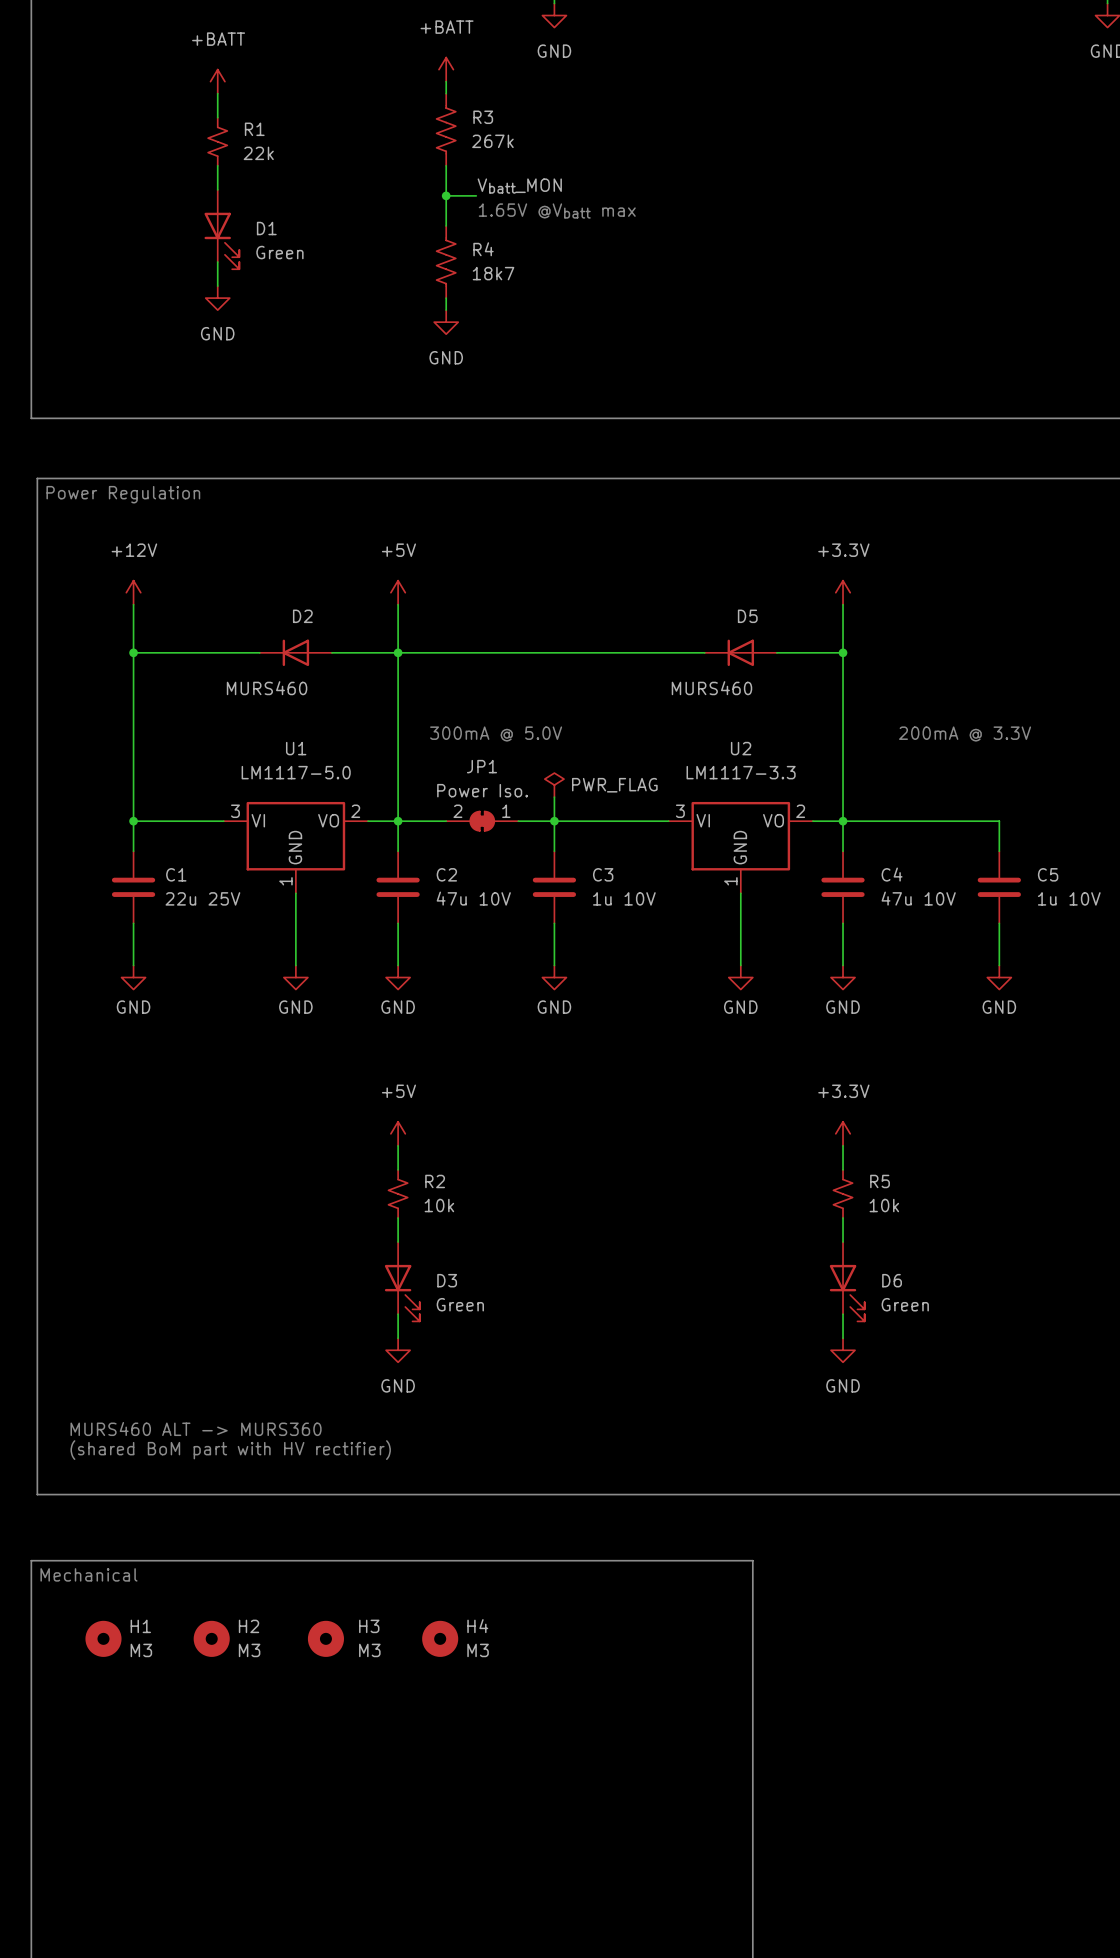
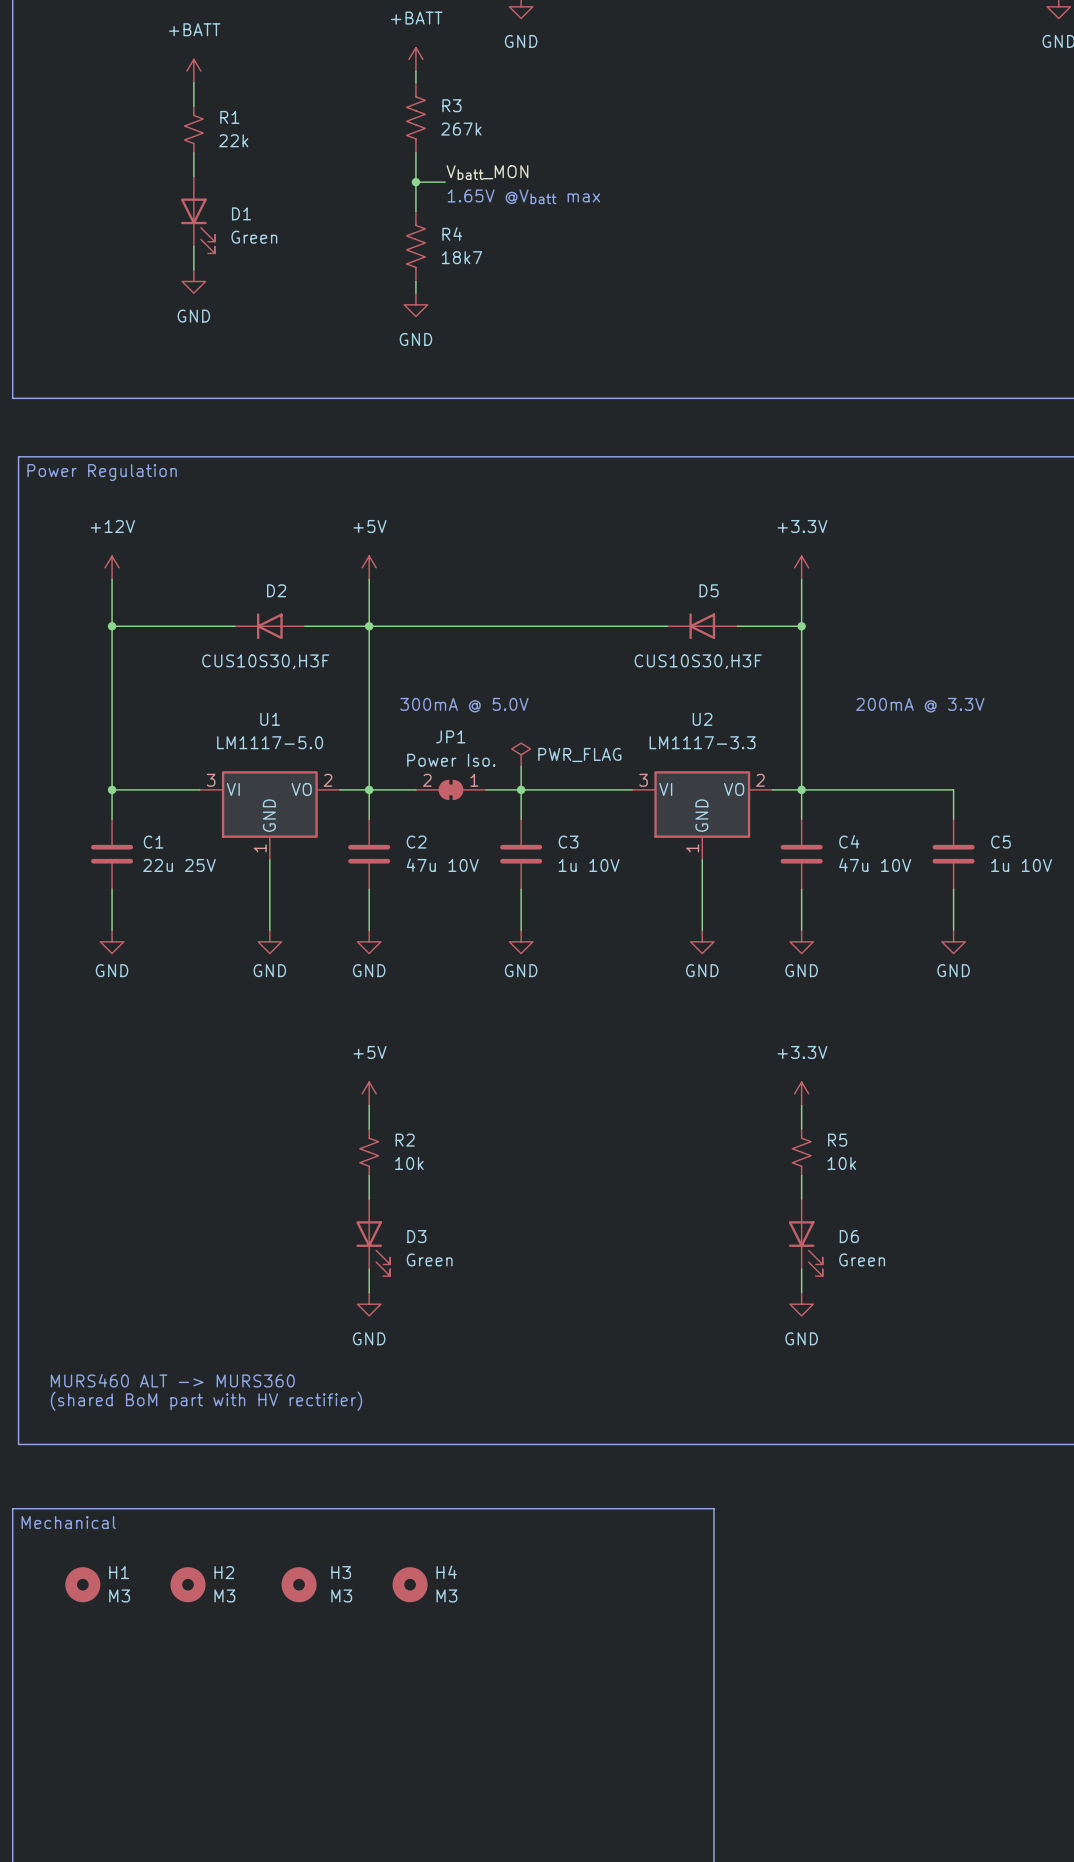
D2 value: MURS460 (267, 688) -> CUS10S30,H3F (265, 661)
D5 value: MURS460 (711, 688) -> CUS10S30,H3F (698, 661)

